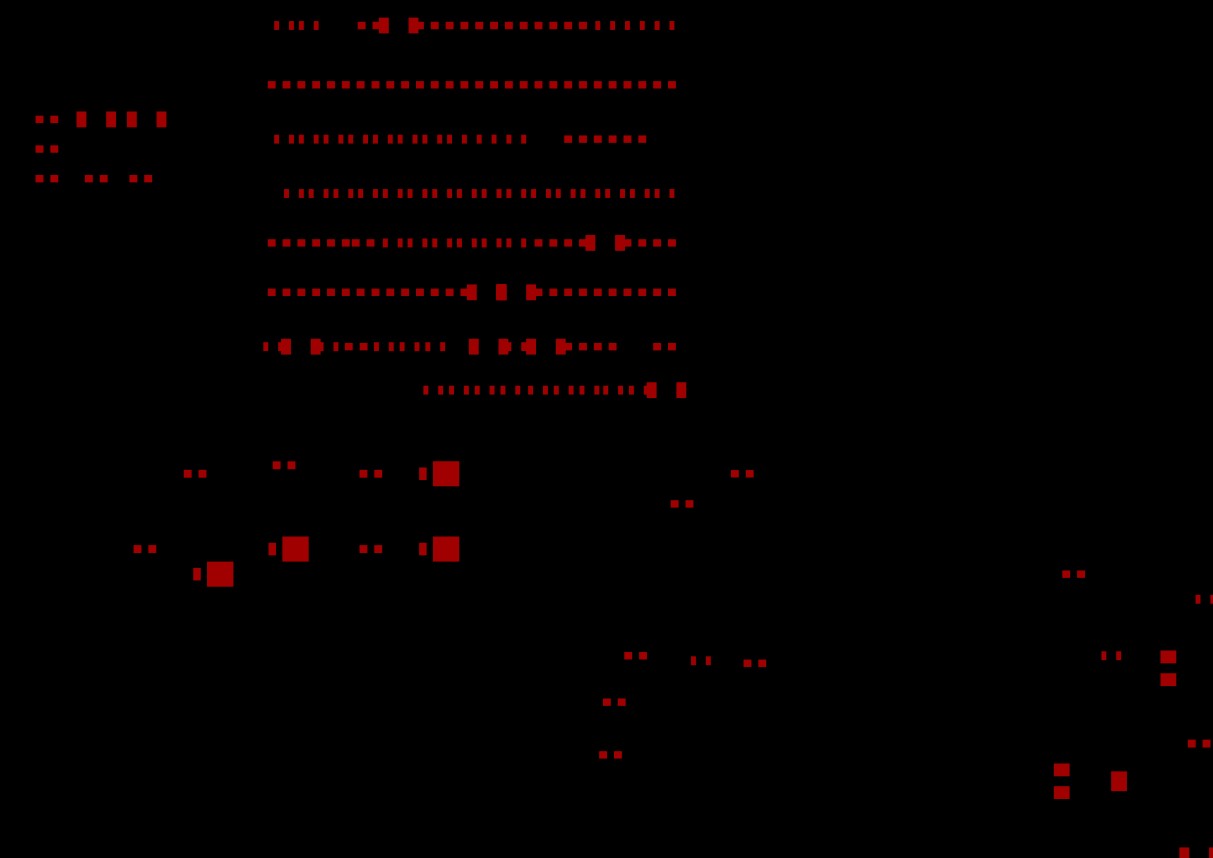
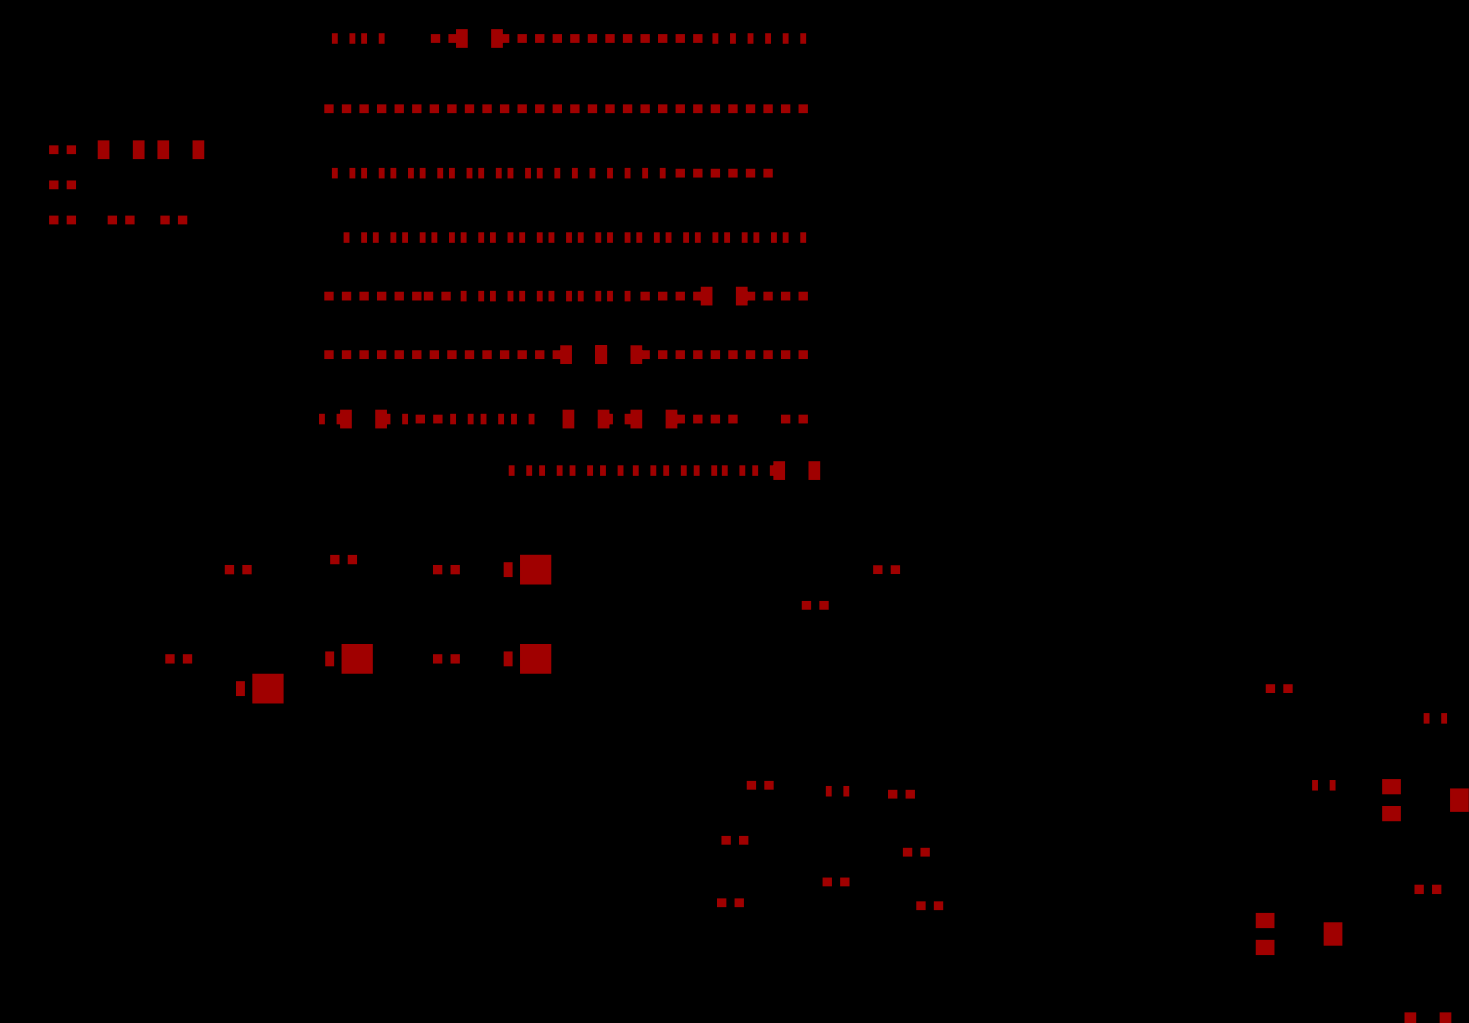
part: none -> (653, 173)
part: none -> (916, 852)
part: none -> (836, 881)
part: none -> (929, 905)

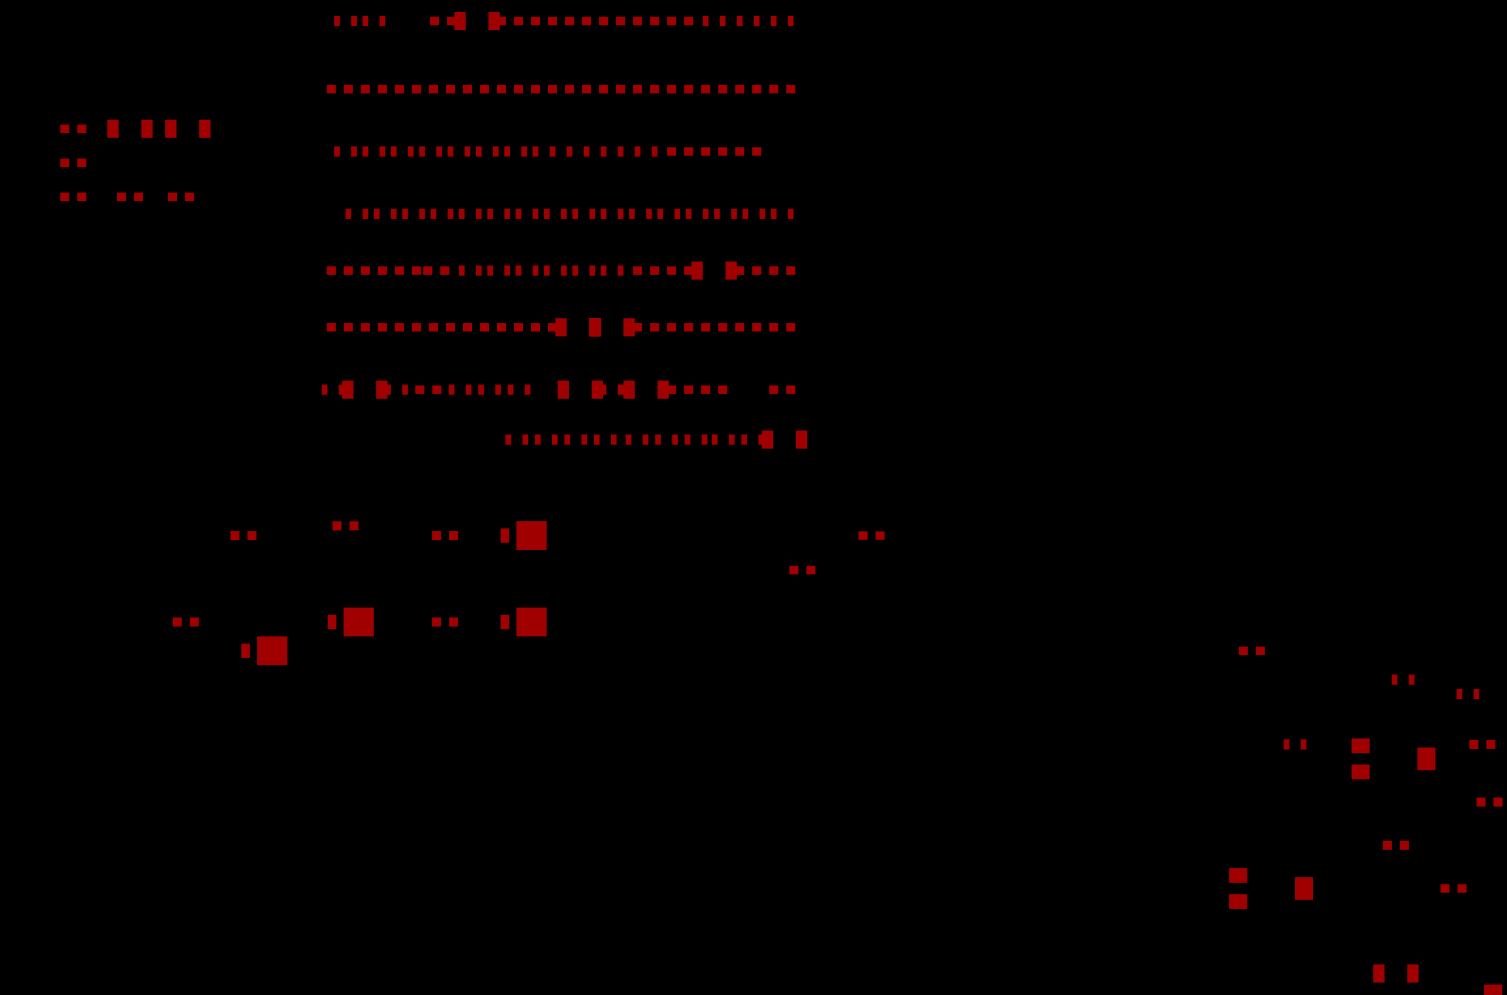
part: (760, 785) -> none
part: (837, 791) -> none
part: (901, 794) -> none
part: (734, 840) -> none
part: (916, 852) -> none
part: (836, 881) -> none
part: (730, 902) -> none
part: (929, 905) -> none

